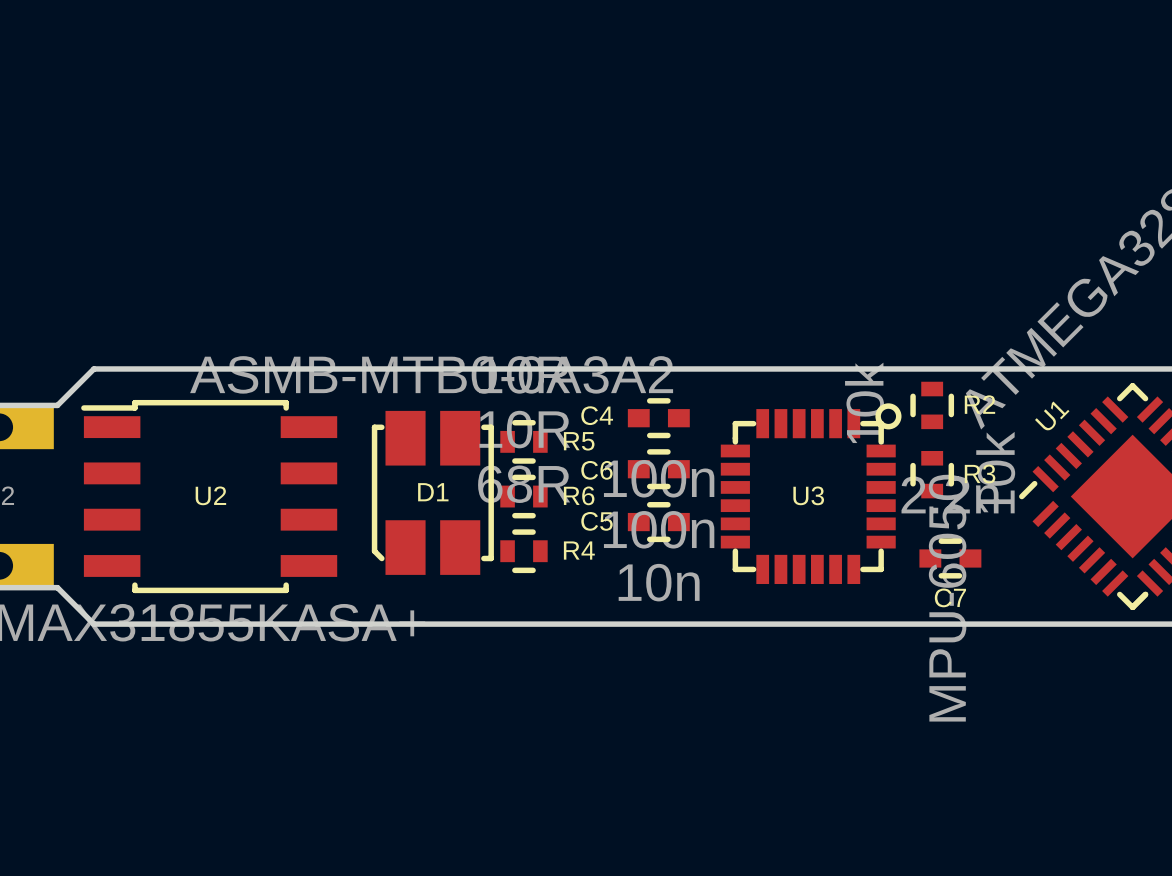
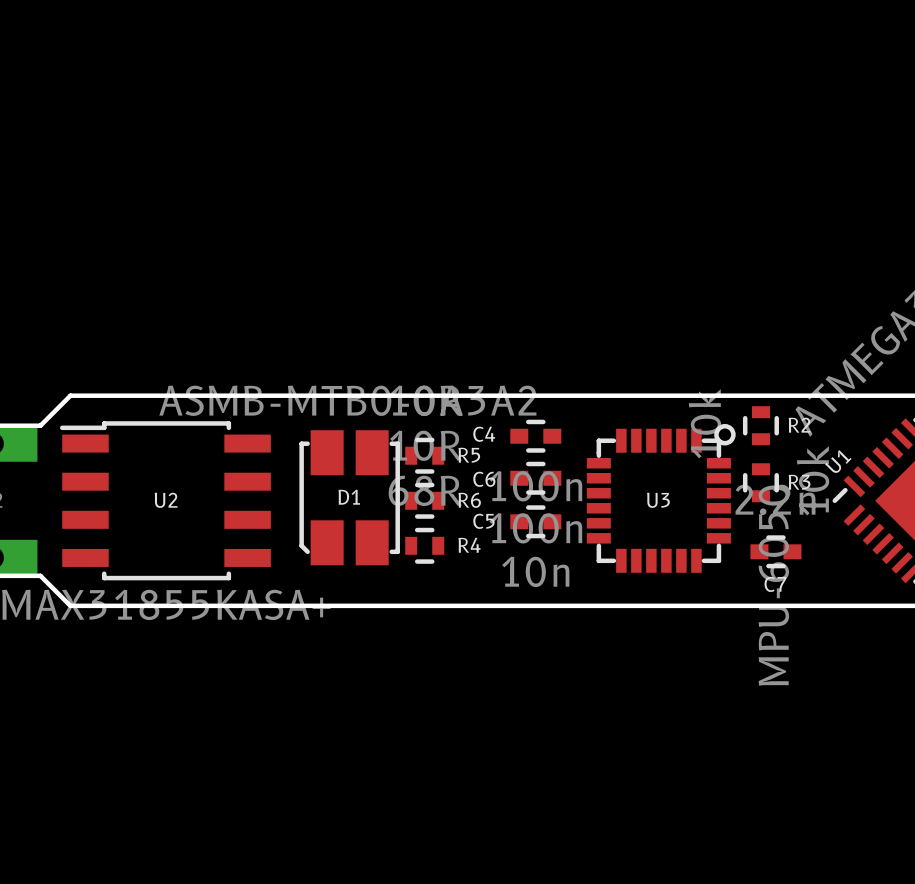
U1 name position: U1 (1052, 416) -> U1 (838, 461)

